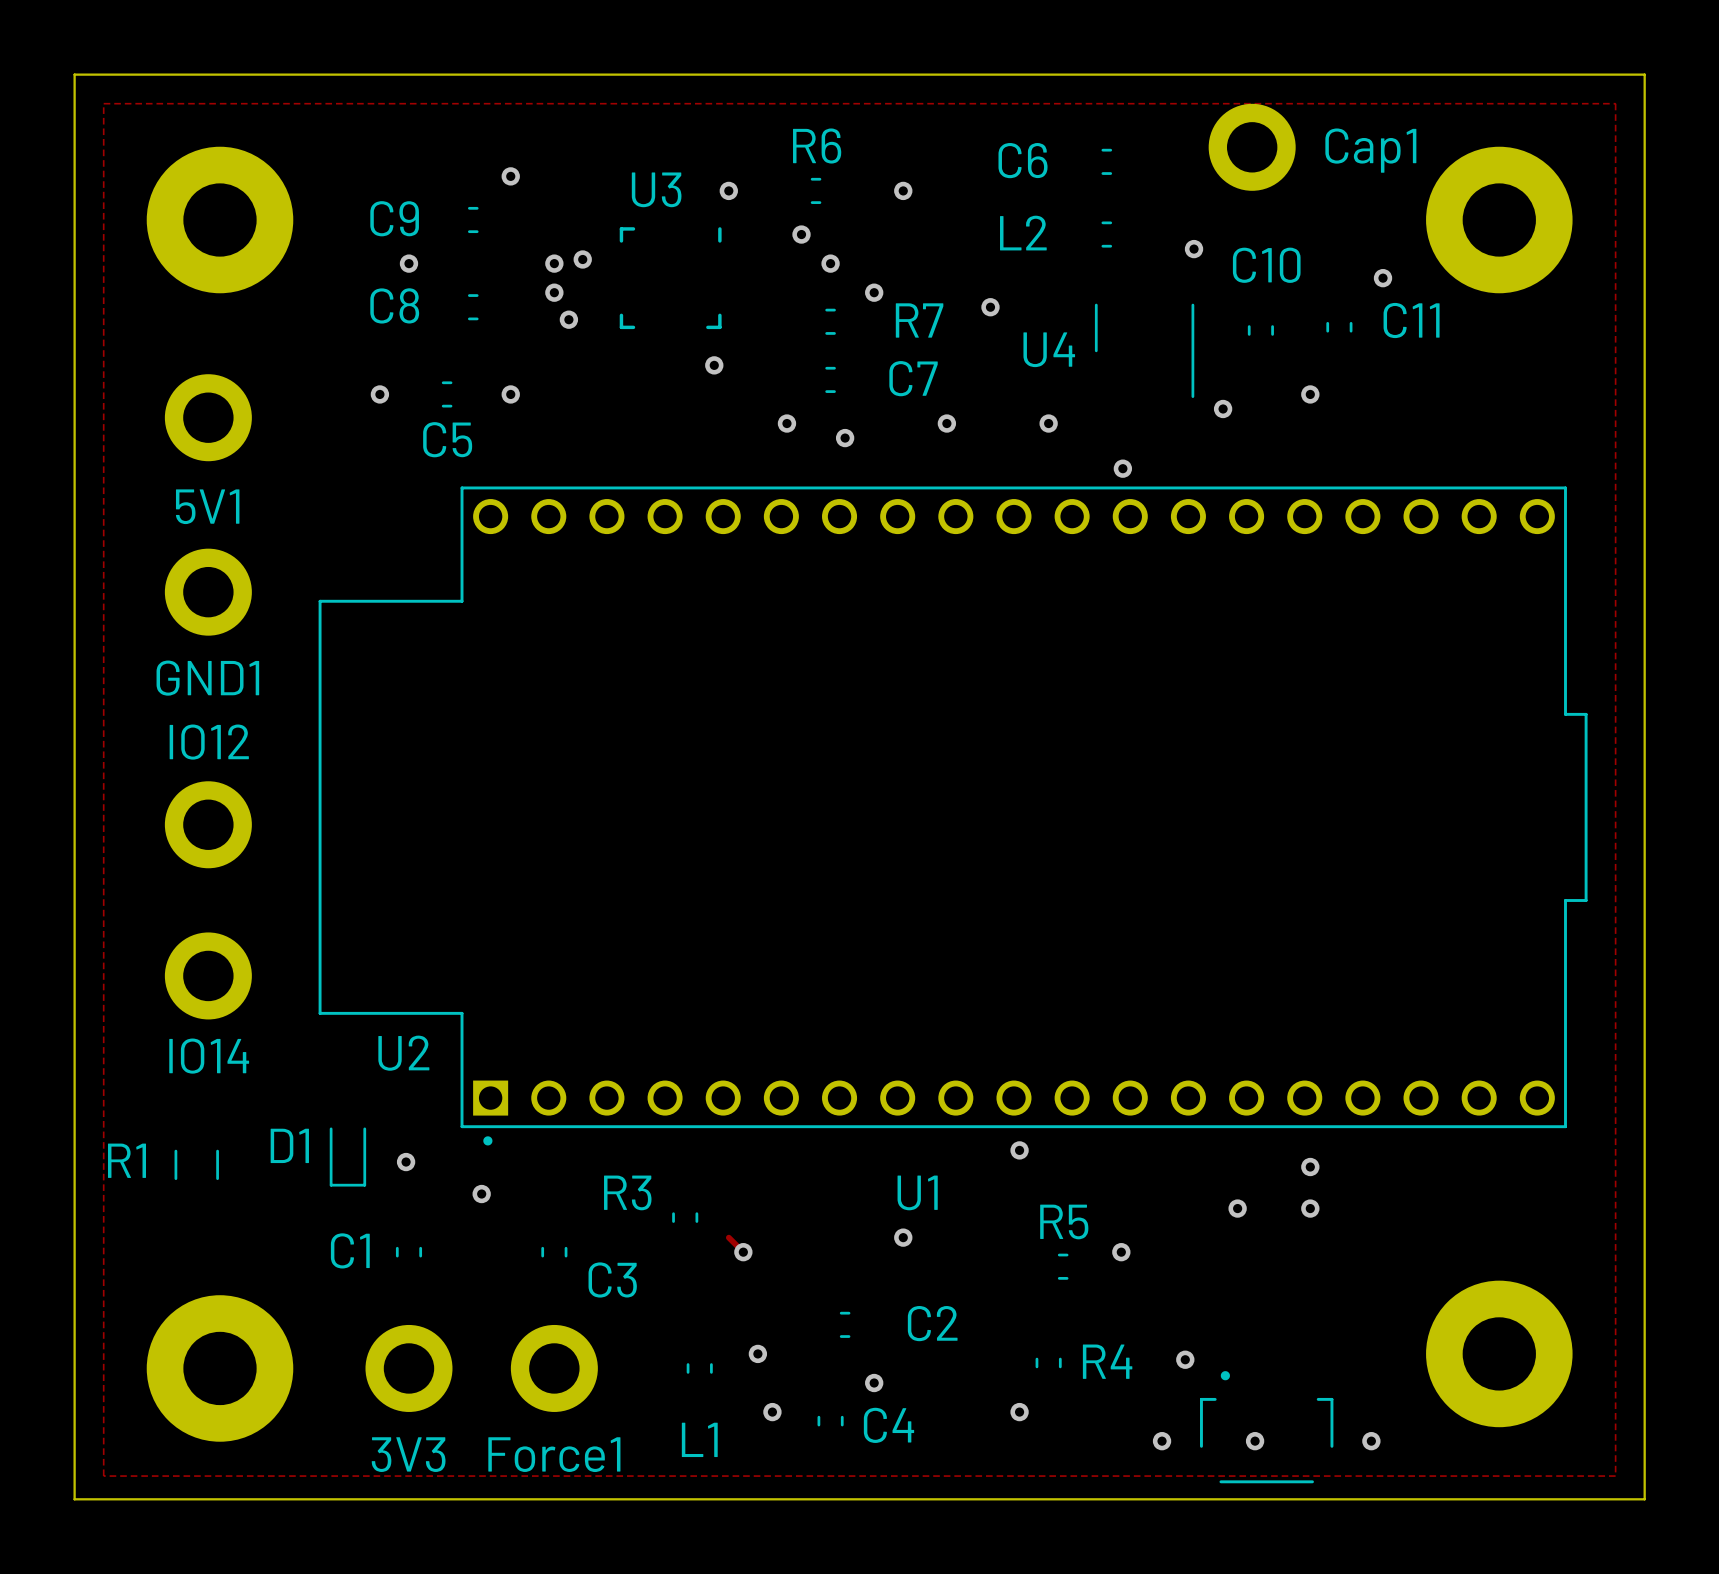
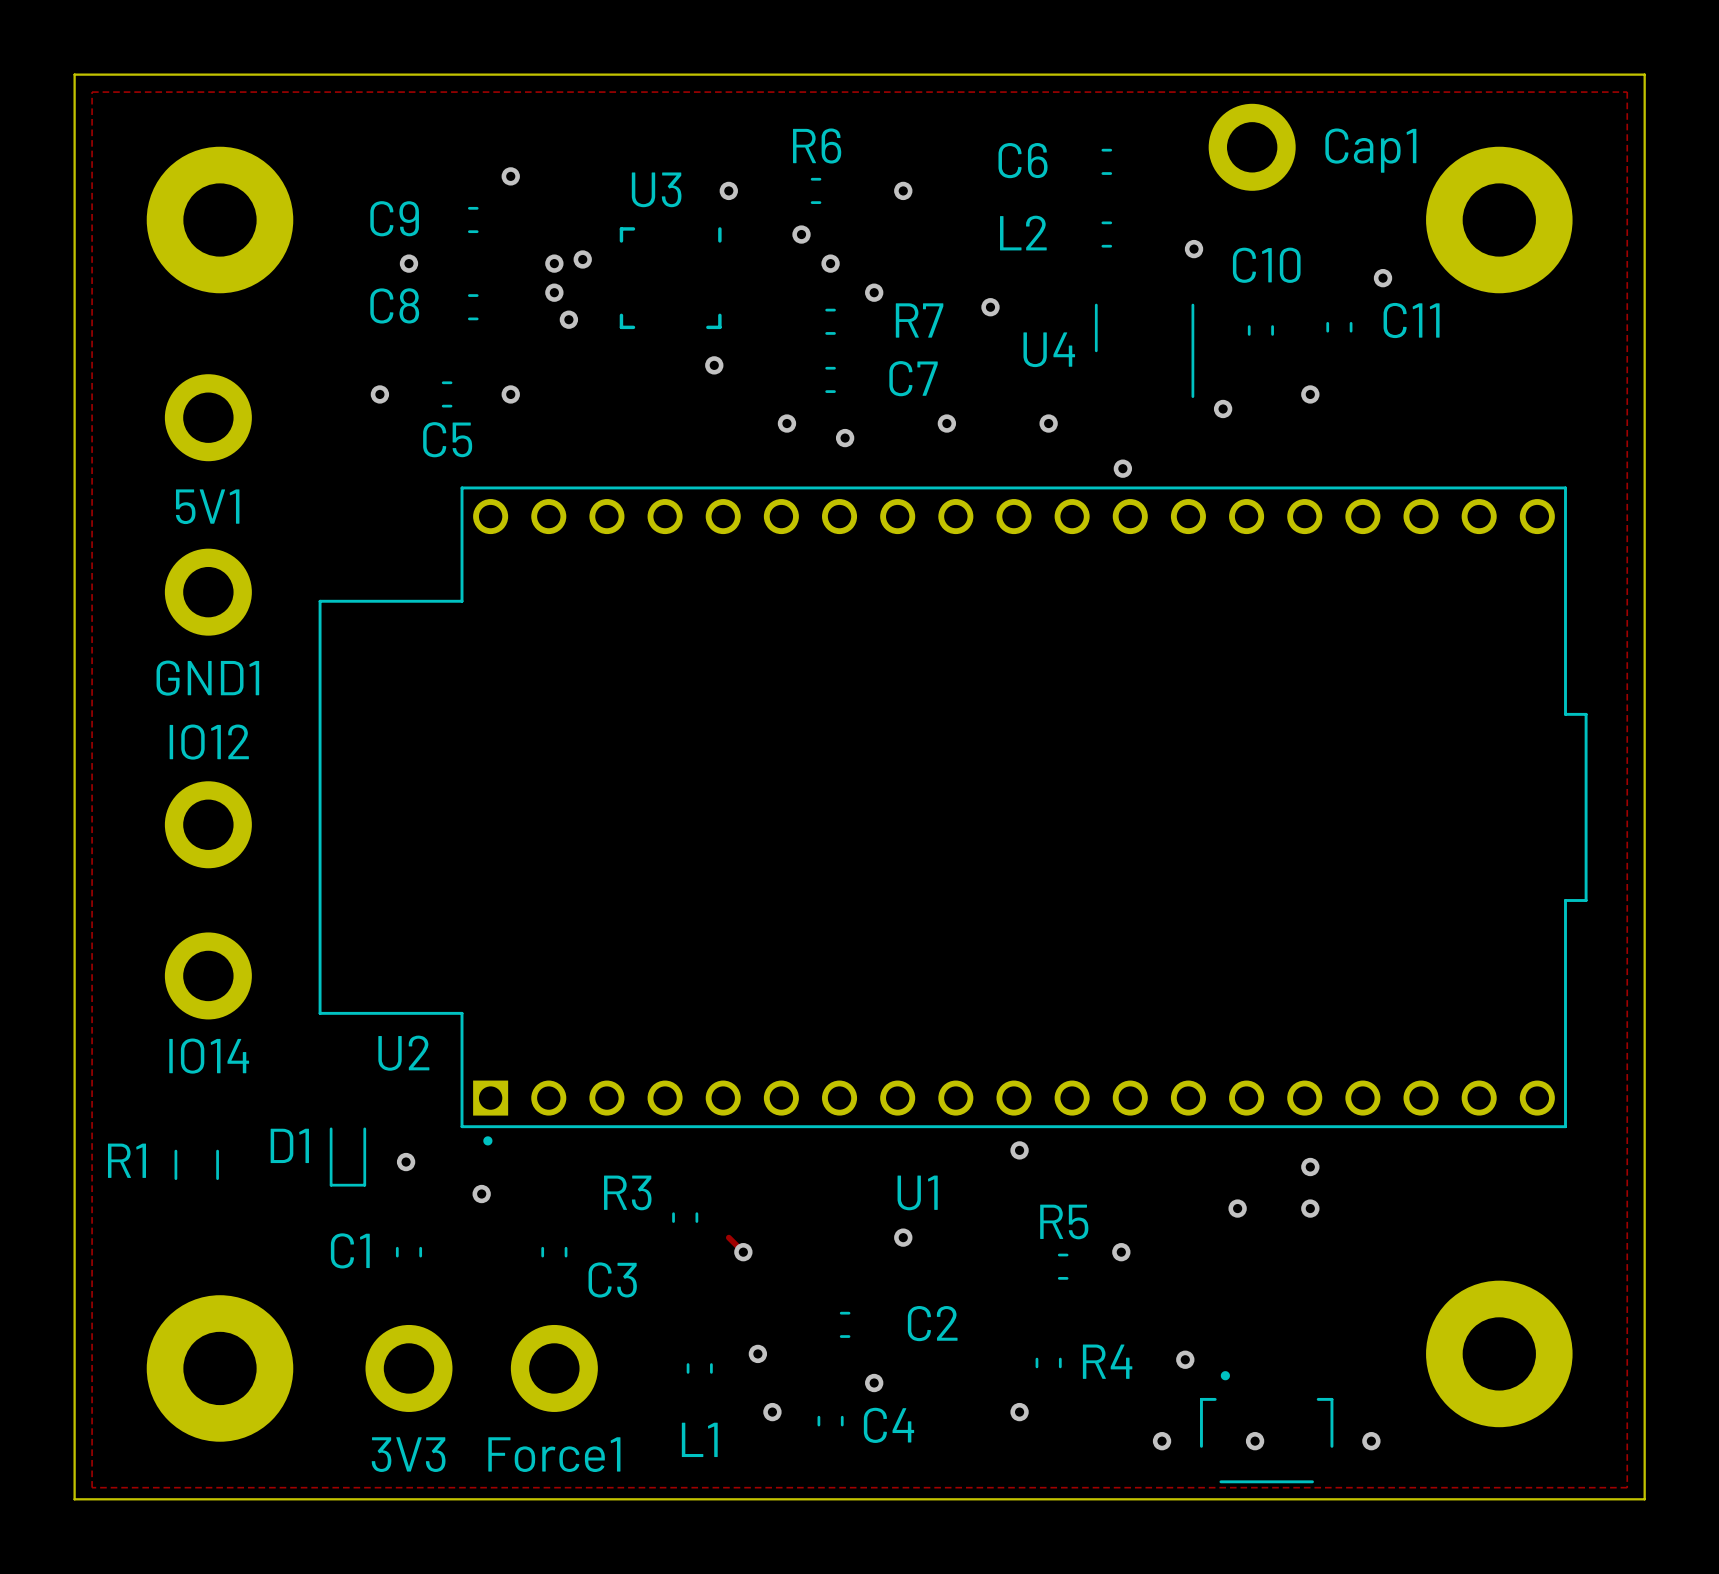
zone outline: (103, 103) (103, 1476) (1615, 1476) (1615, 103) (103, 103) -> (92, 92) (92, 1487) (1627, 1487) (1627, 92) (92, 92)

